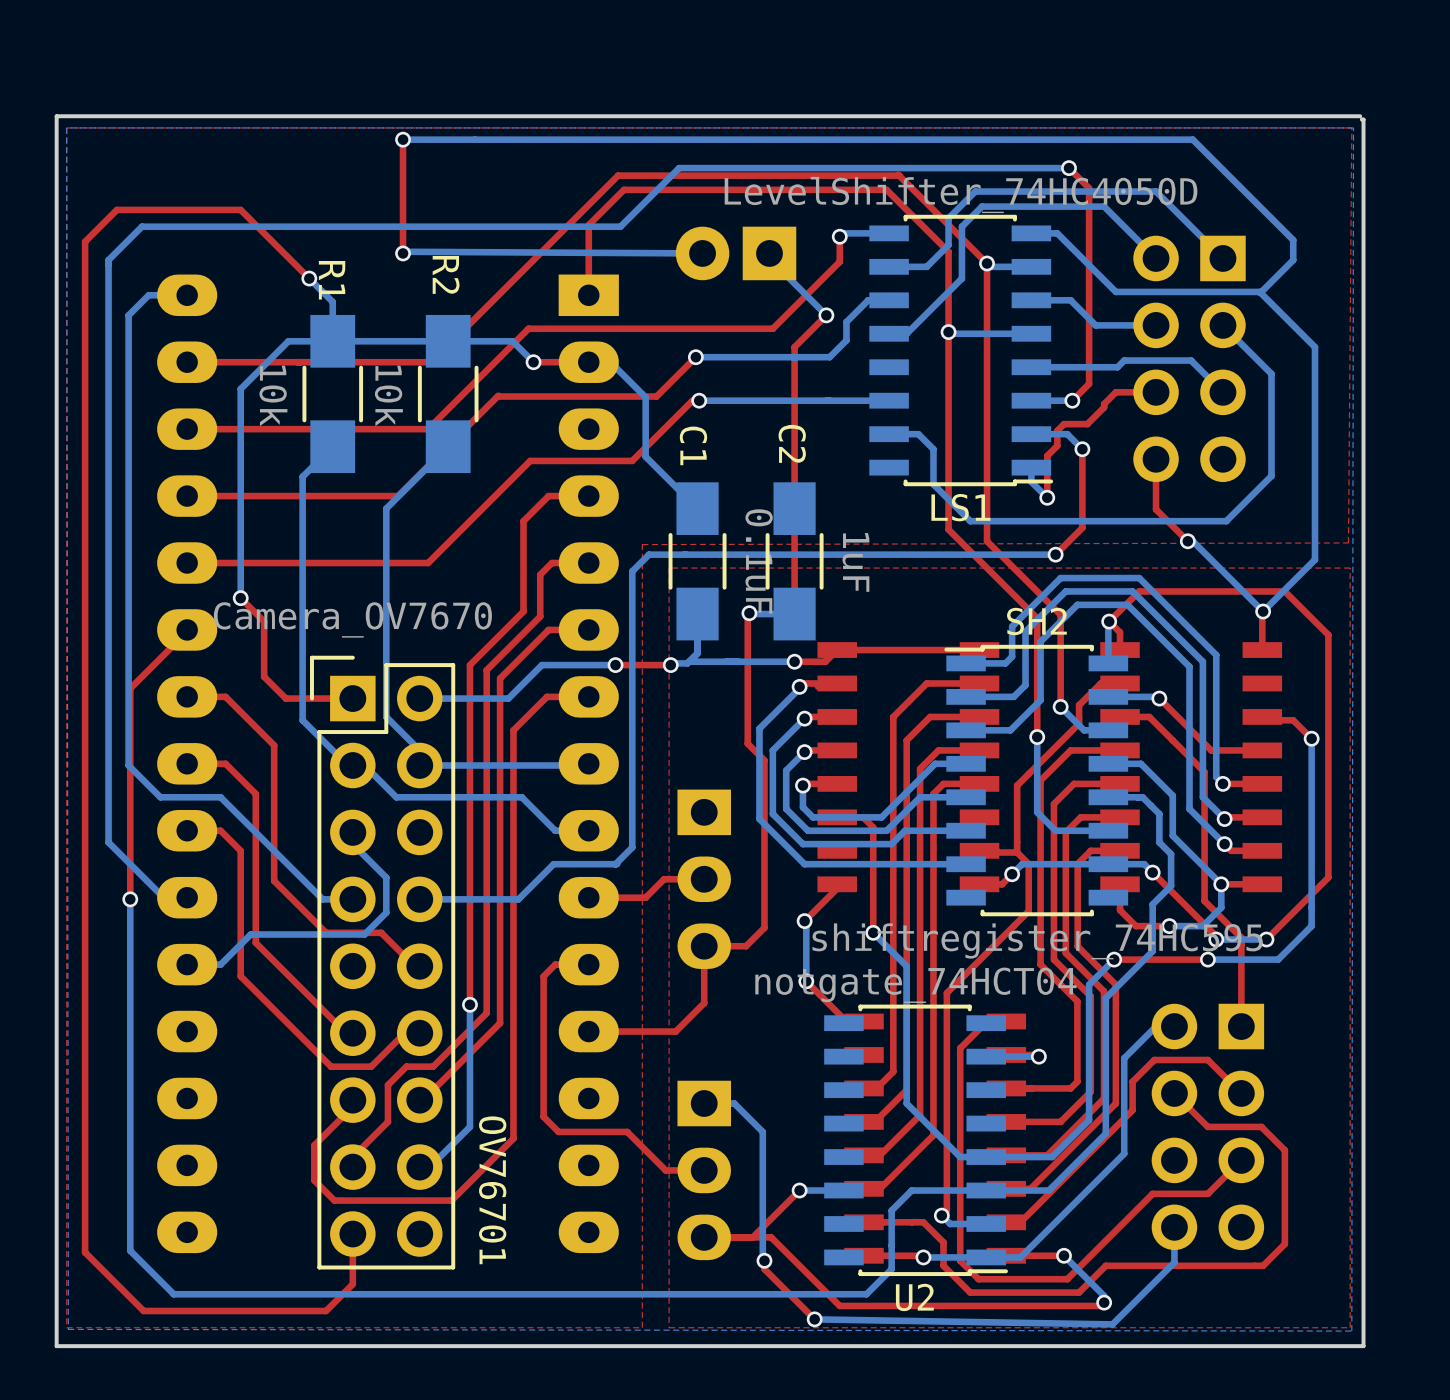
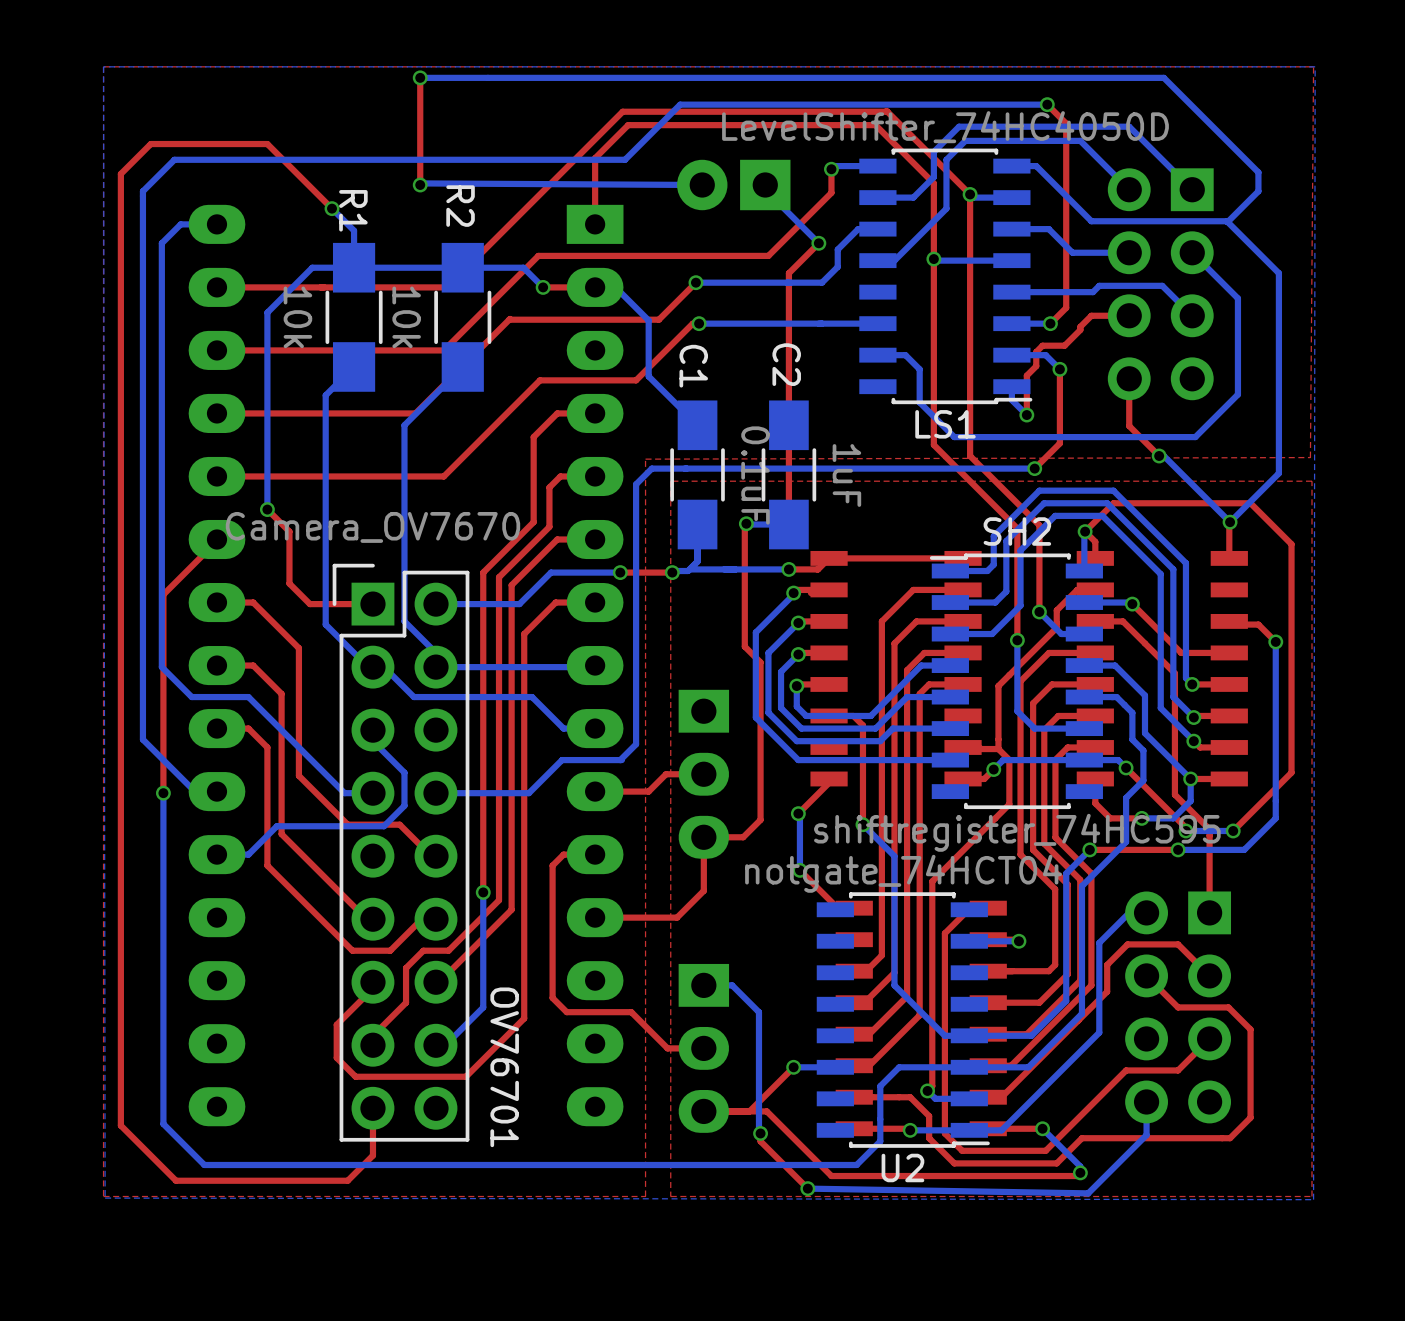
board edge: (1360, 116) (56, 116) (56, 1346) (1363, 1346) (1363, 119) (1361, 119) -> none

